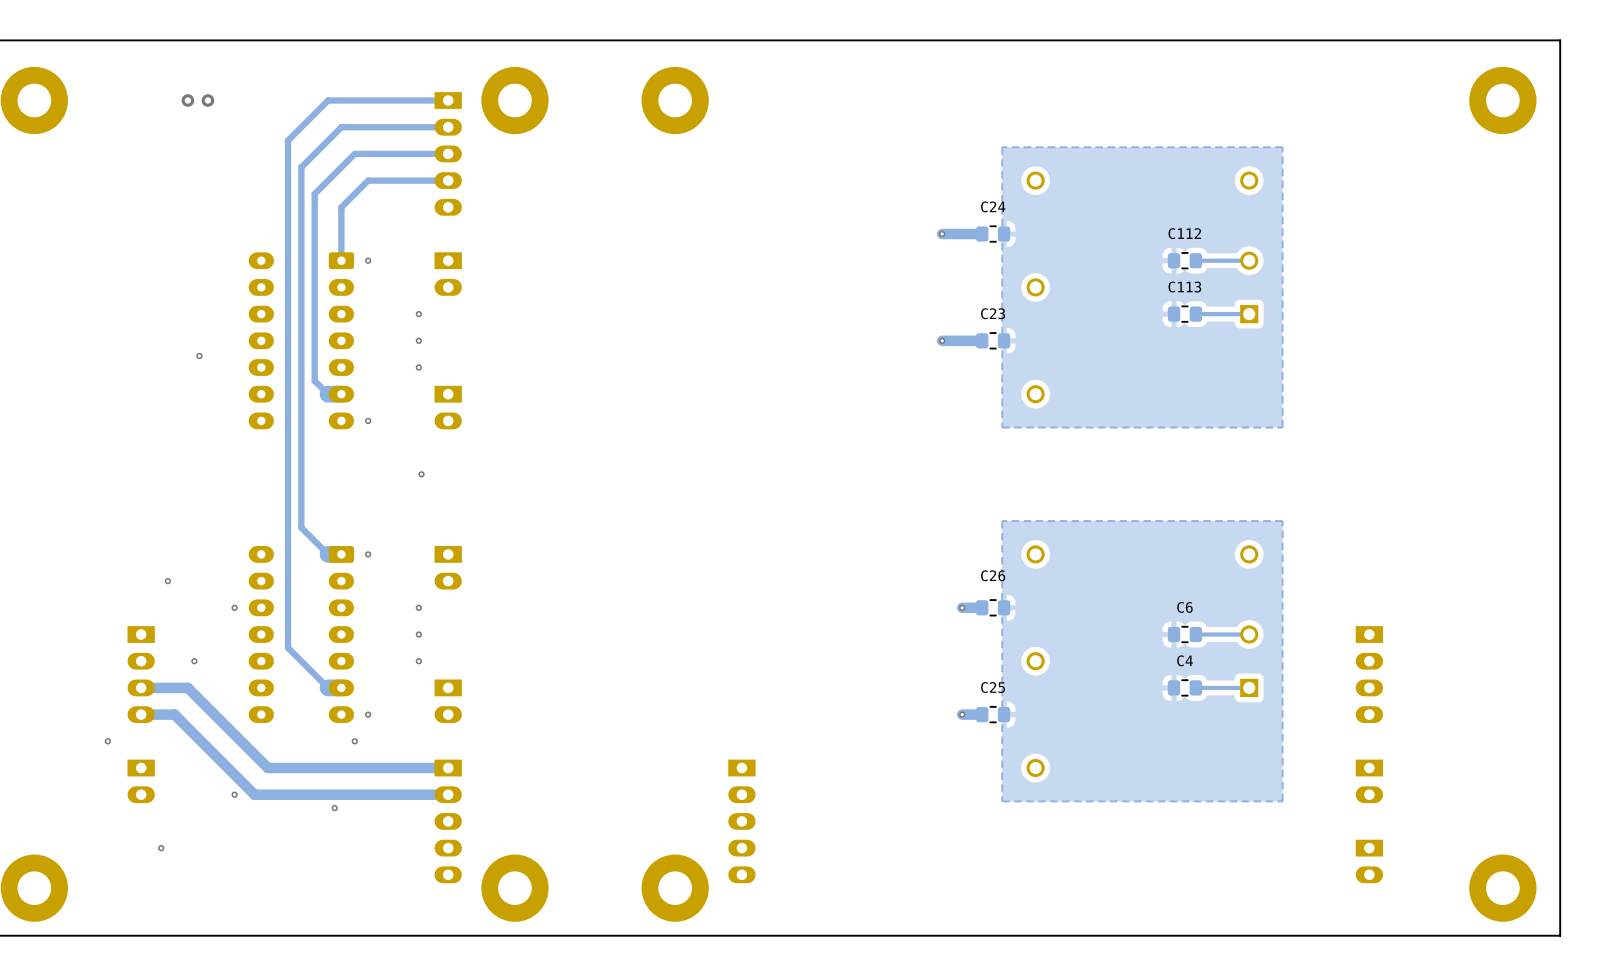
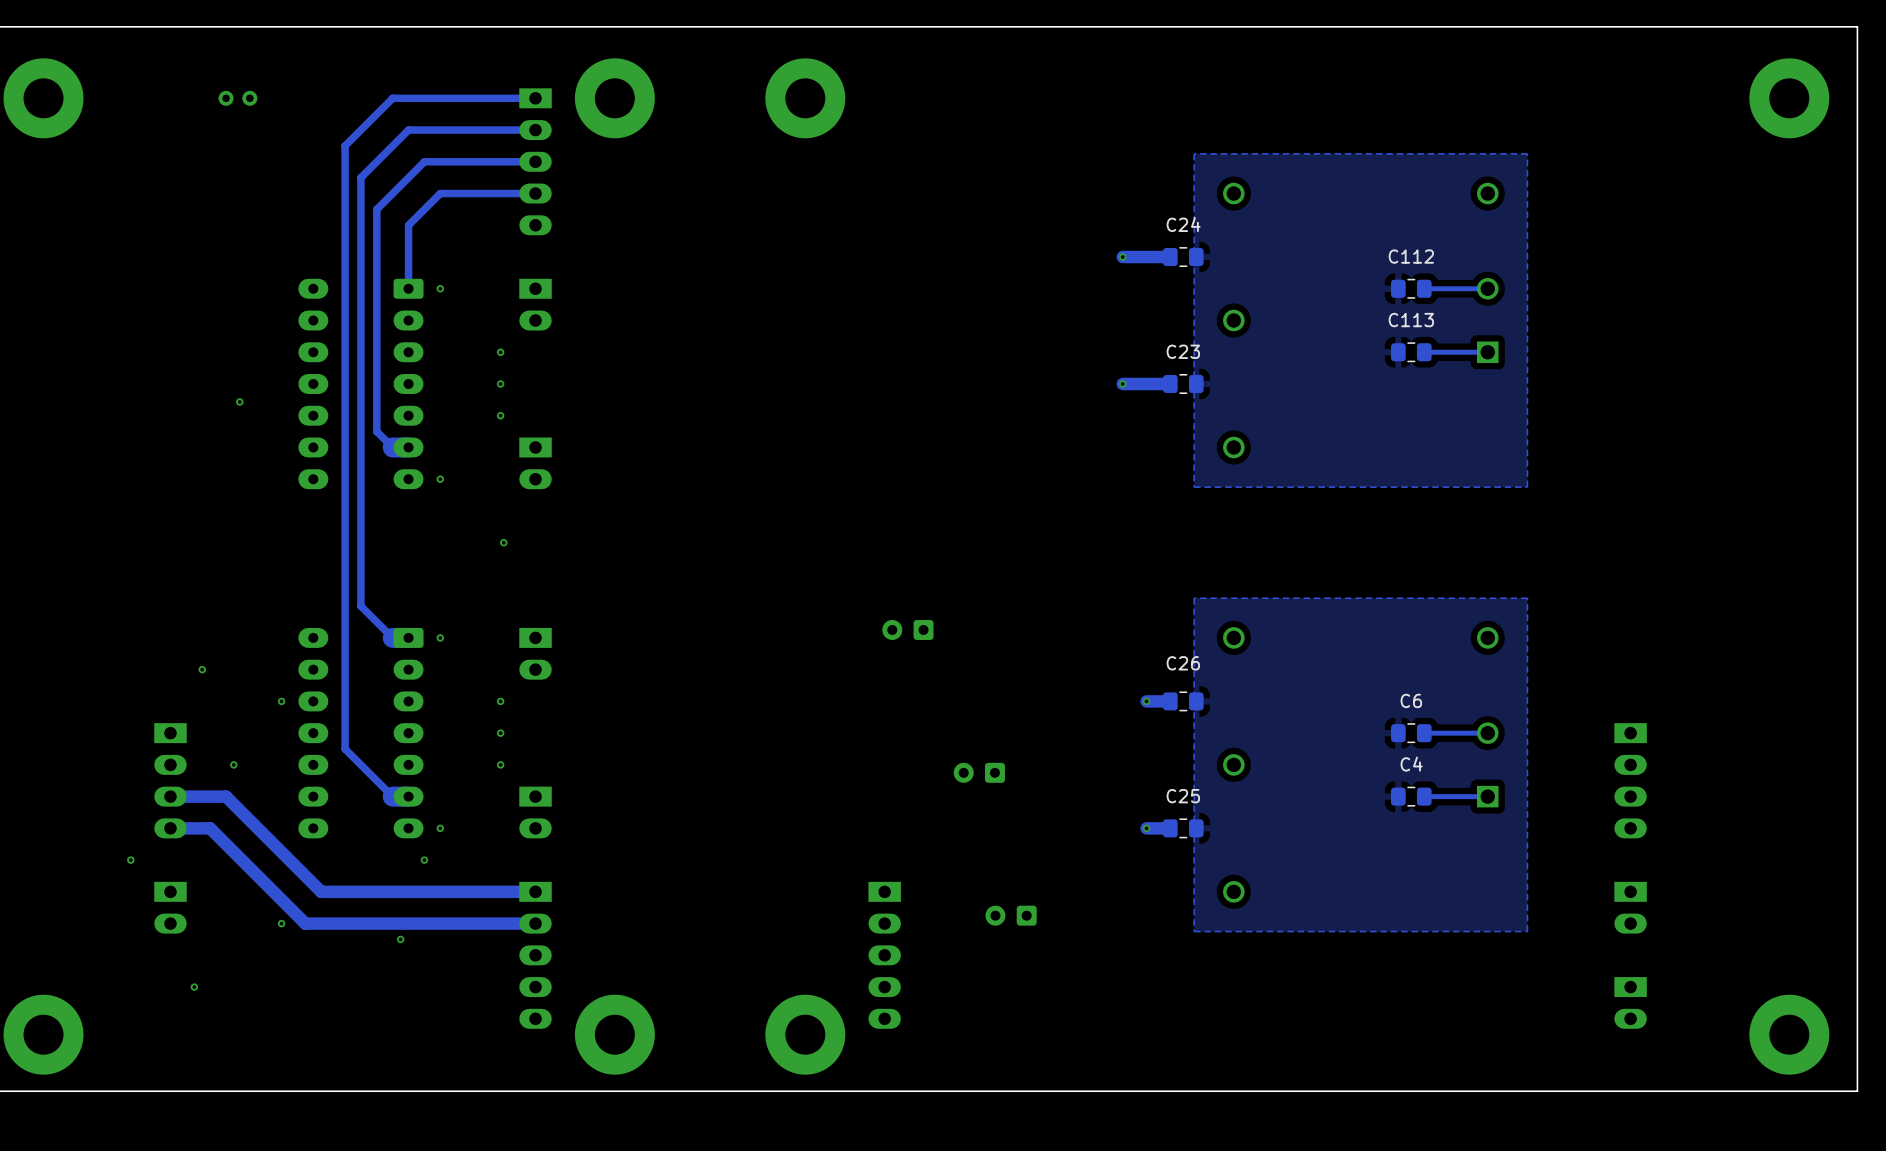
part: none -> (907, 629)
part: none -> (979, 772)
part: none -> (1011, 915)

